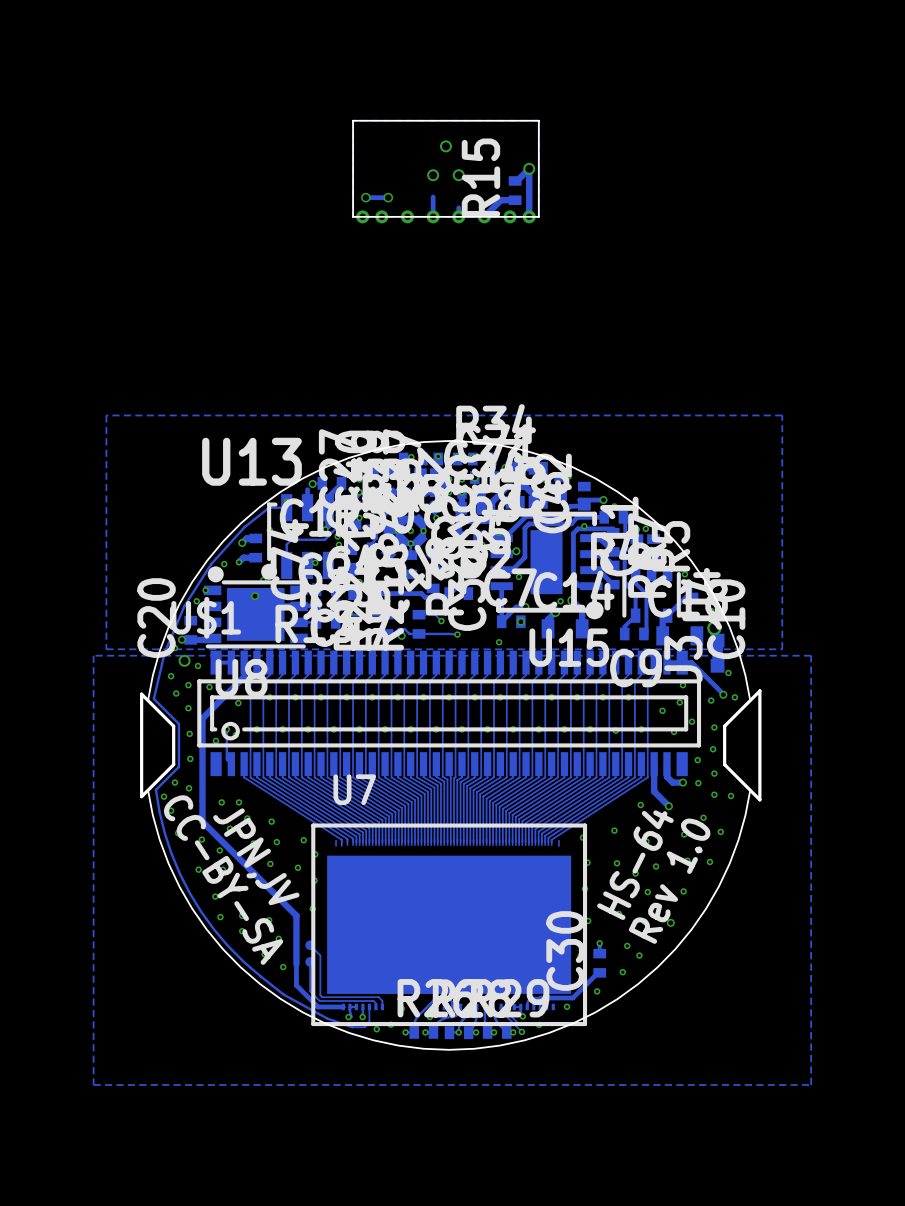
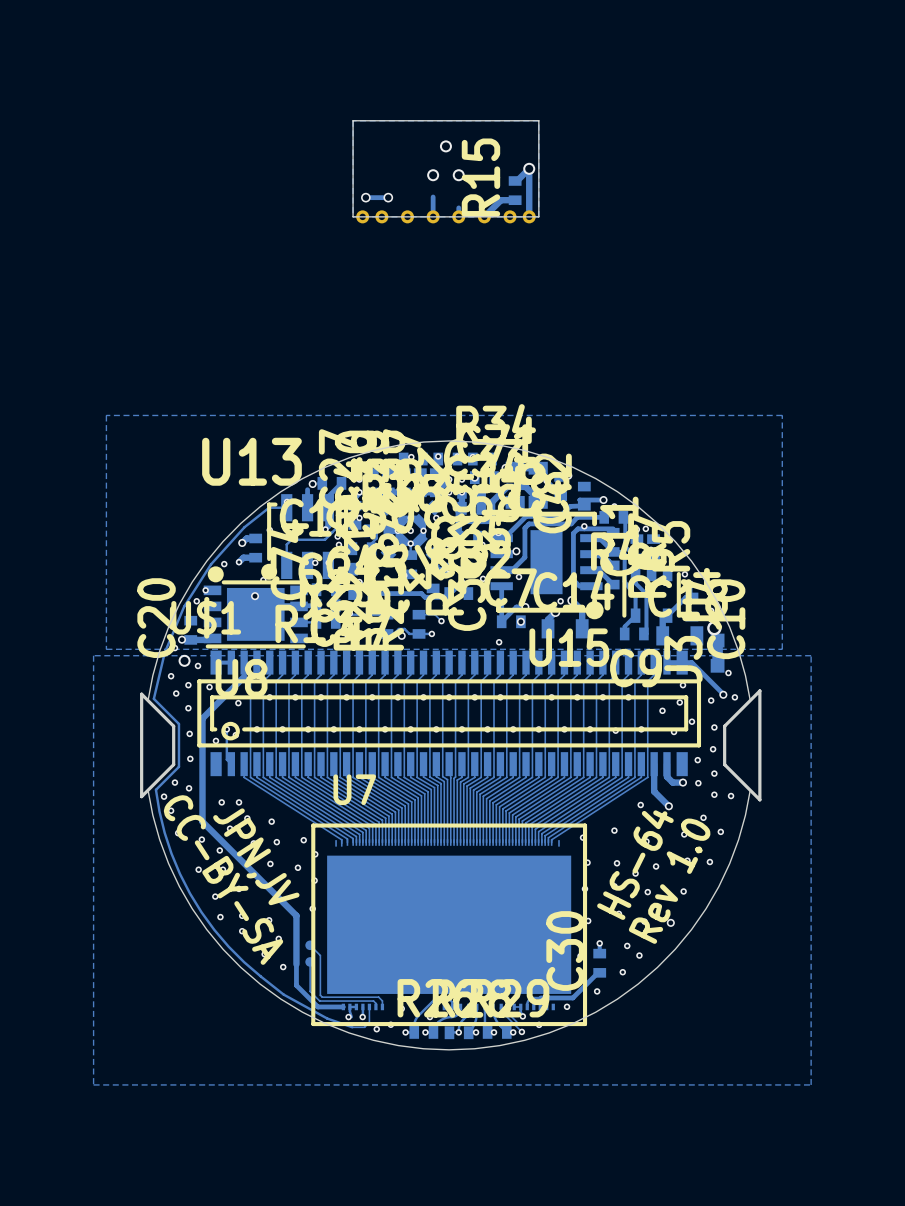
track: (431, 633) (457, 634) -> none
via: none -> (431, 633)
via position: (457, 634) -> (483, 578)

